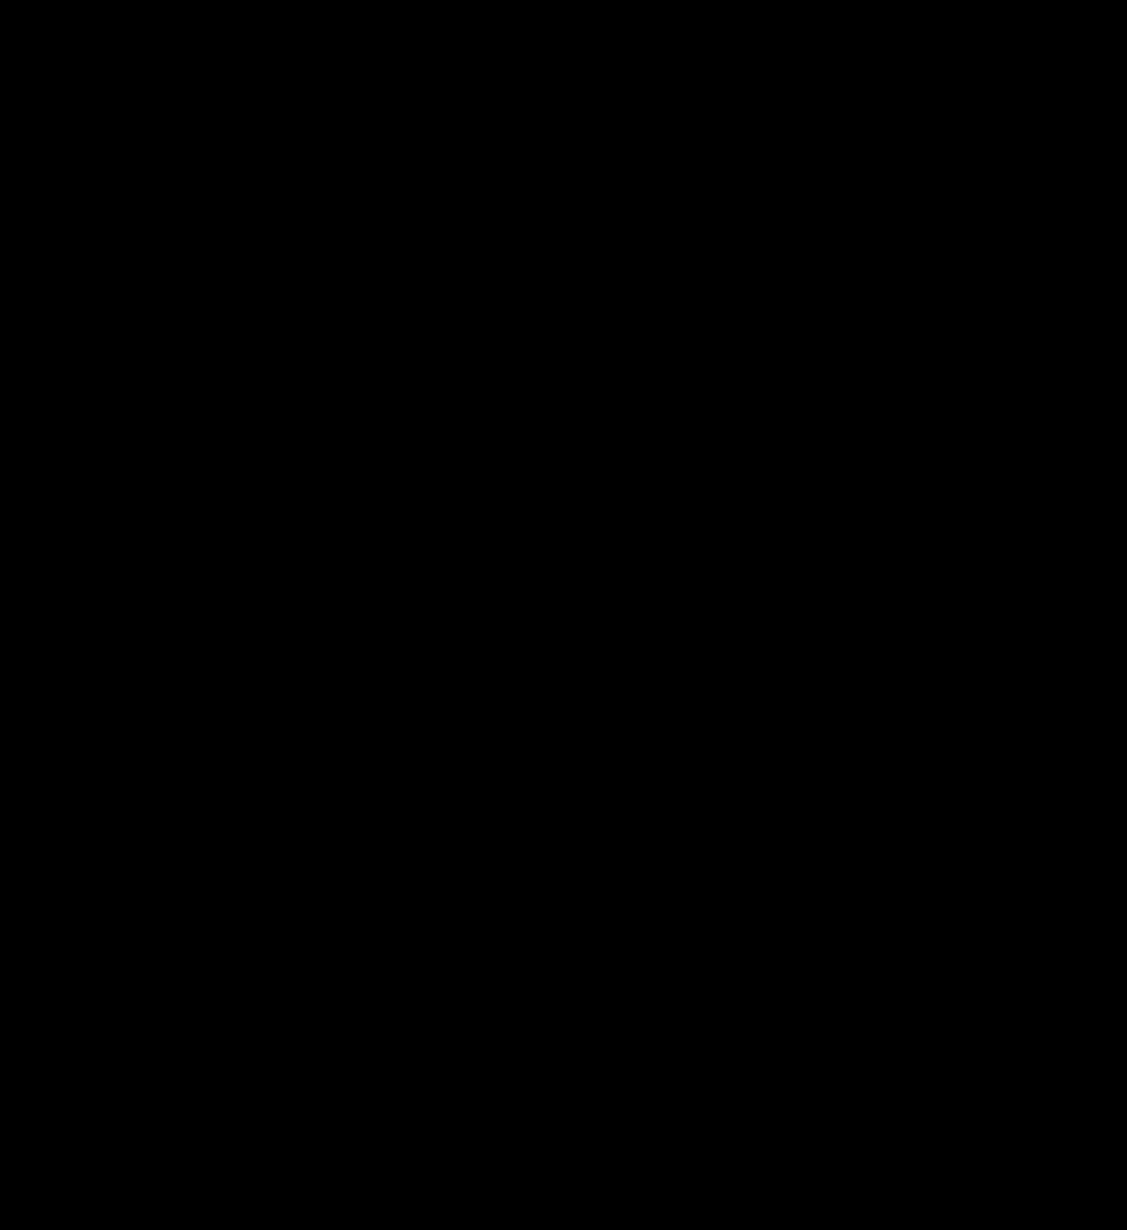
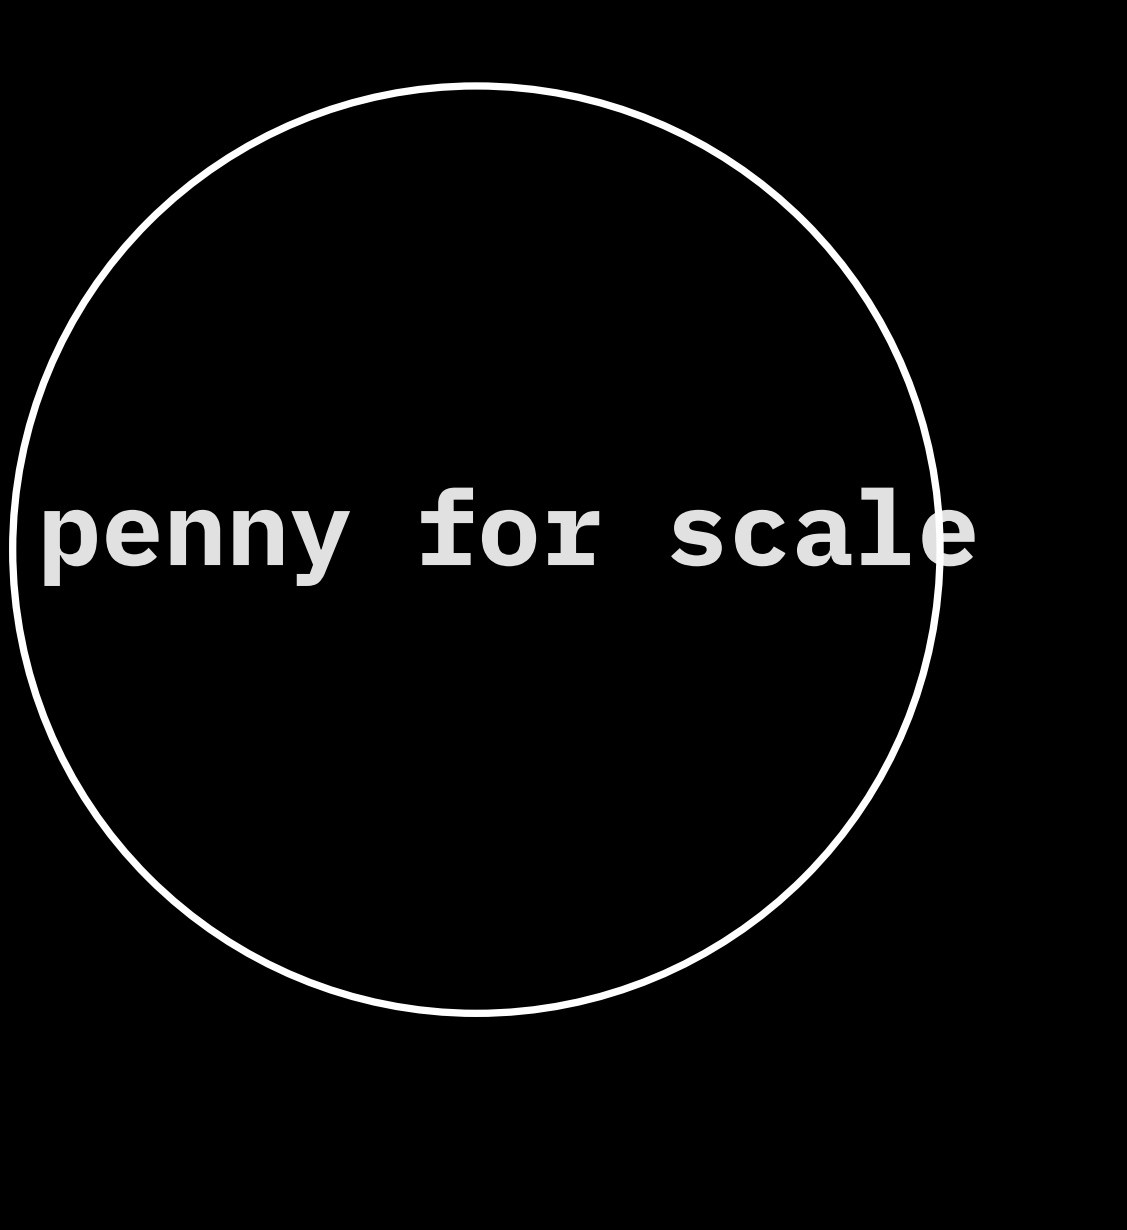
round board edge: none -> [9, 82, 944, 1017]
text: none -> penny for scale (509, 536)

